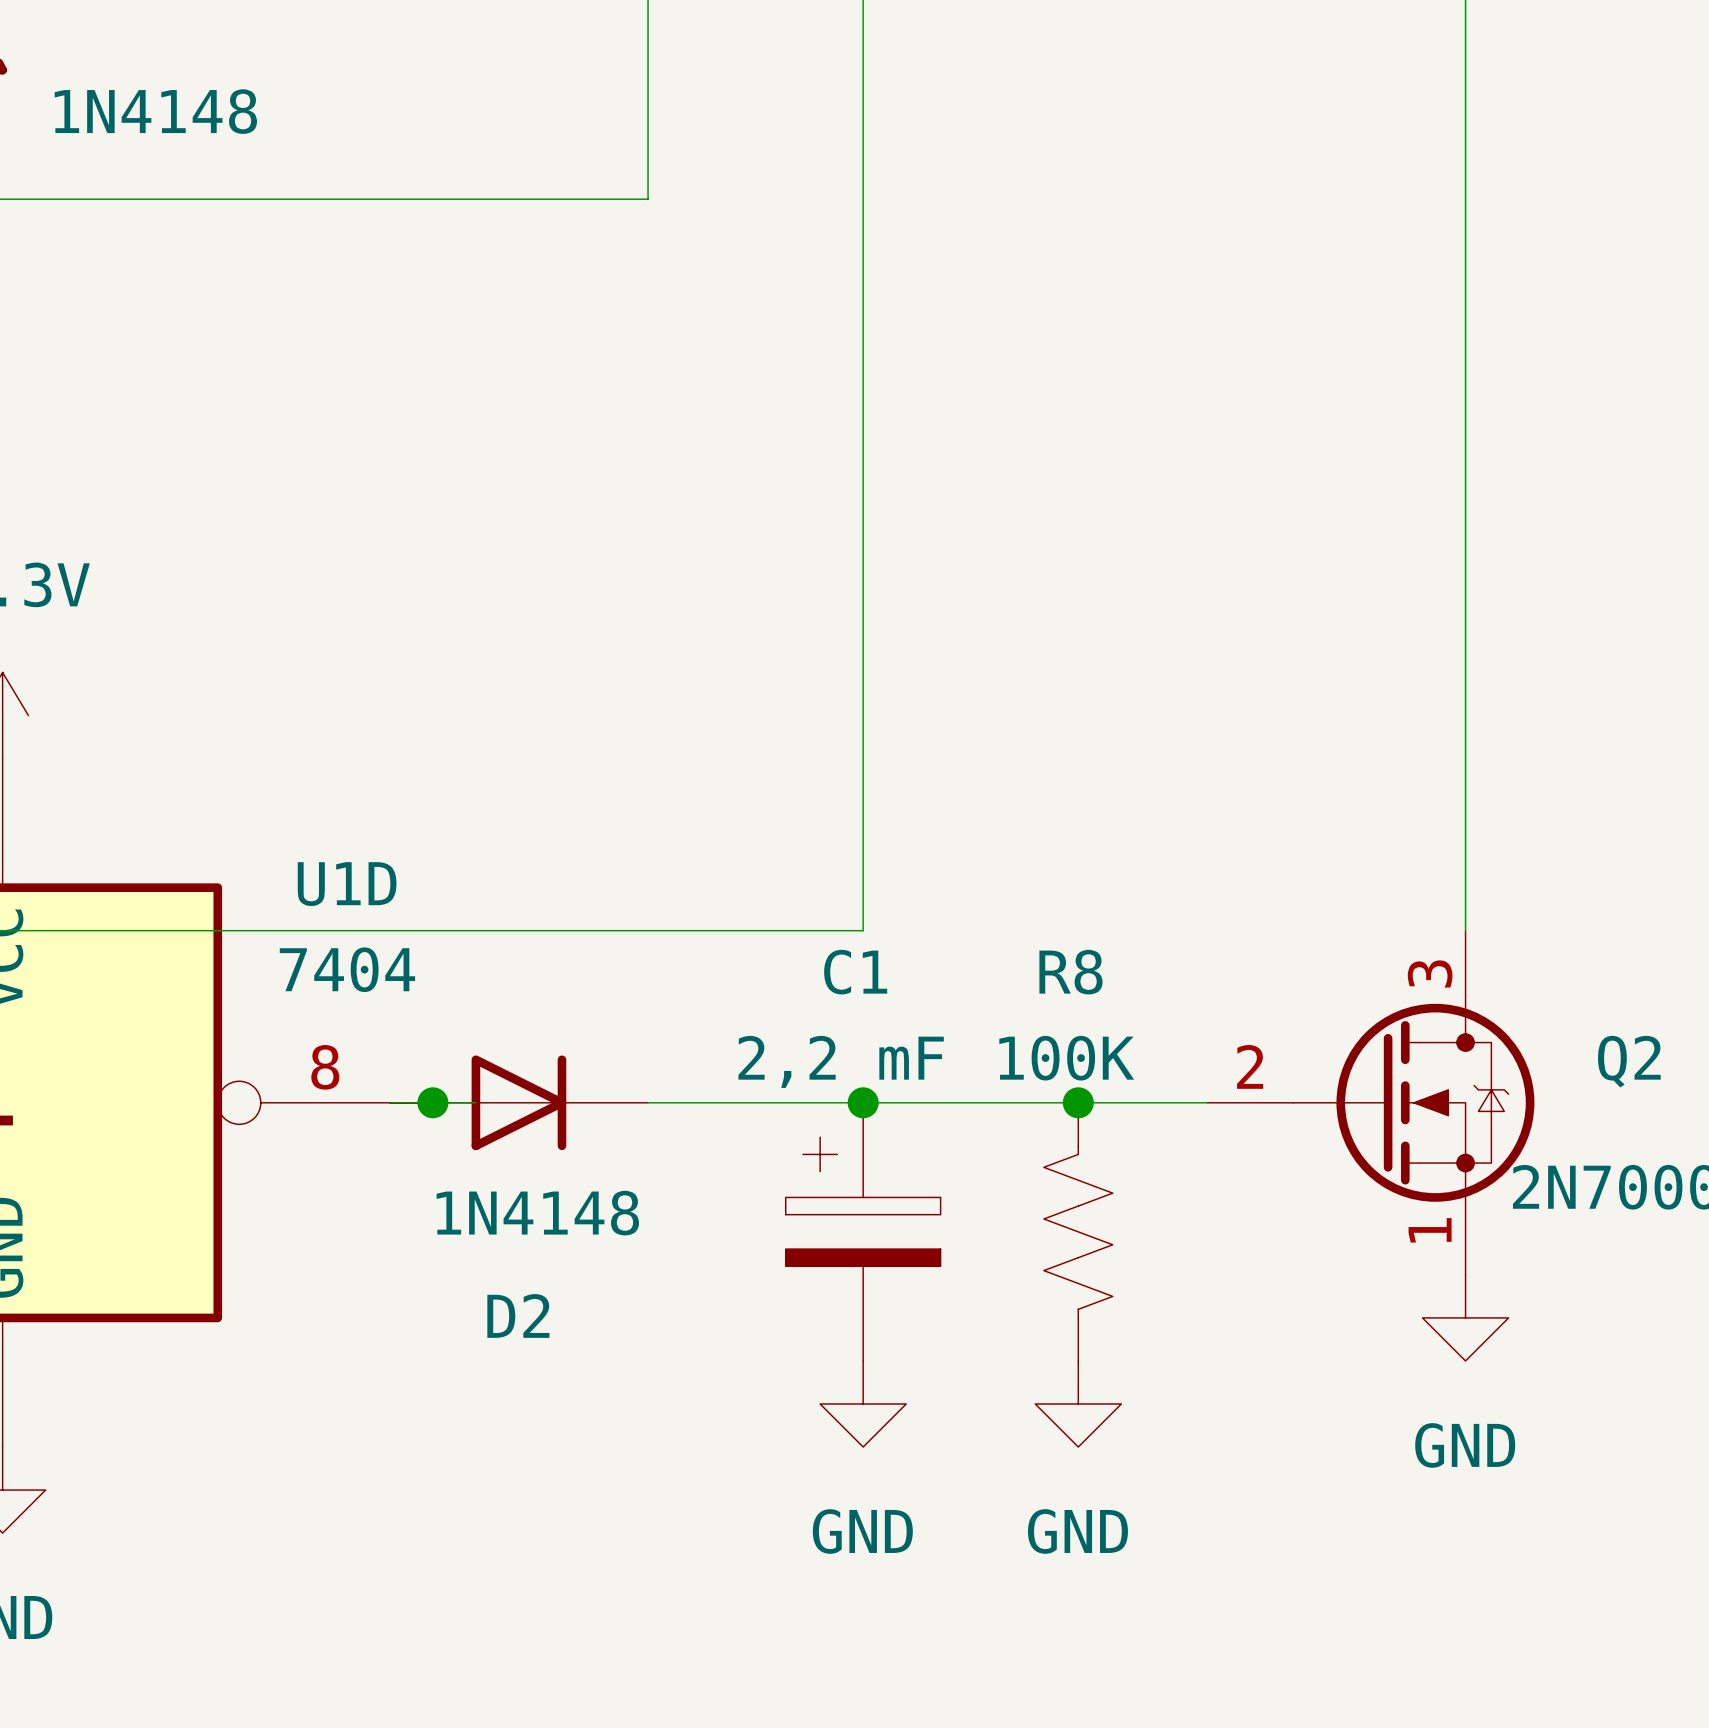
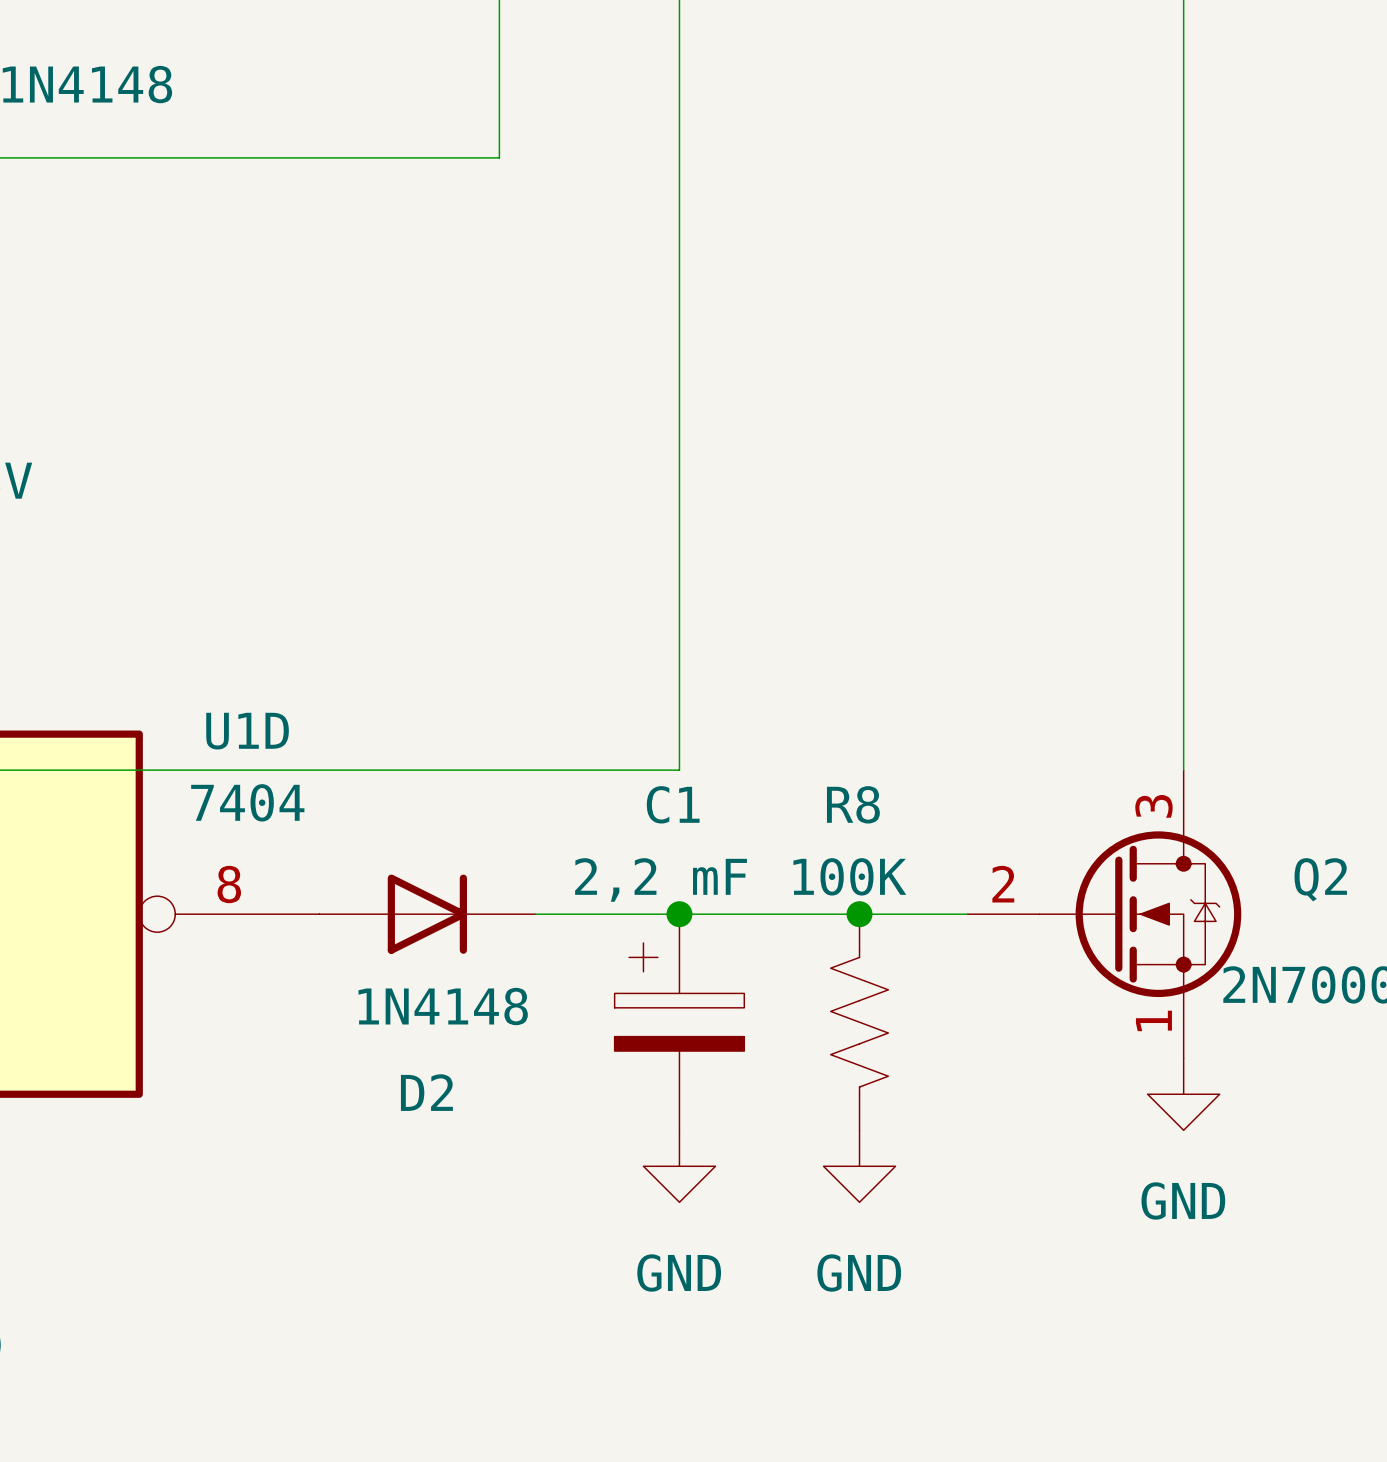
junction: (432, 1102) -> none
D2 position: (518, 1102) -> (427, 914)

